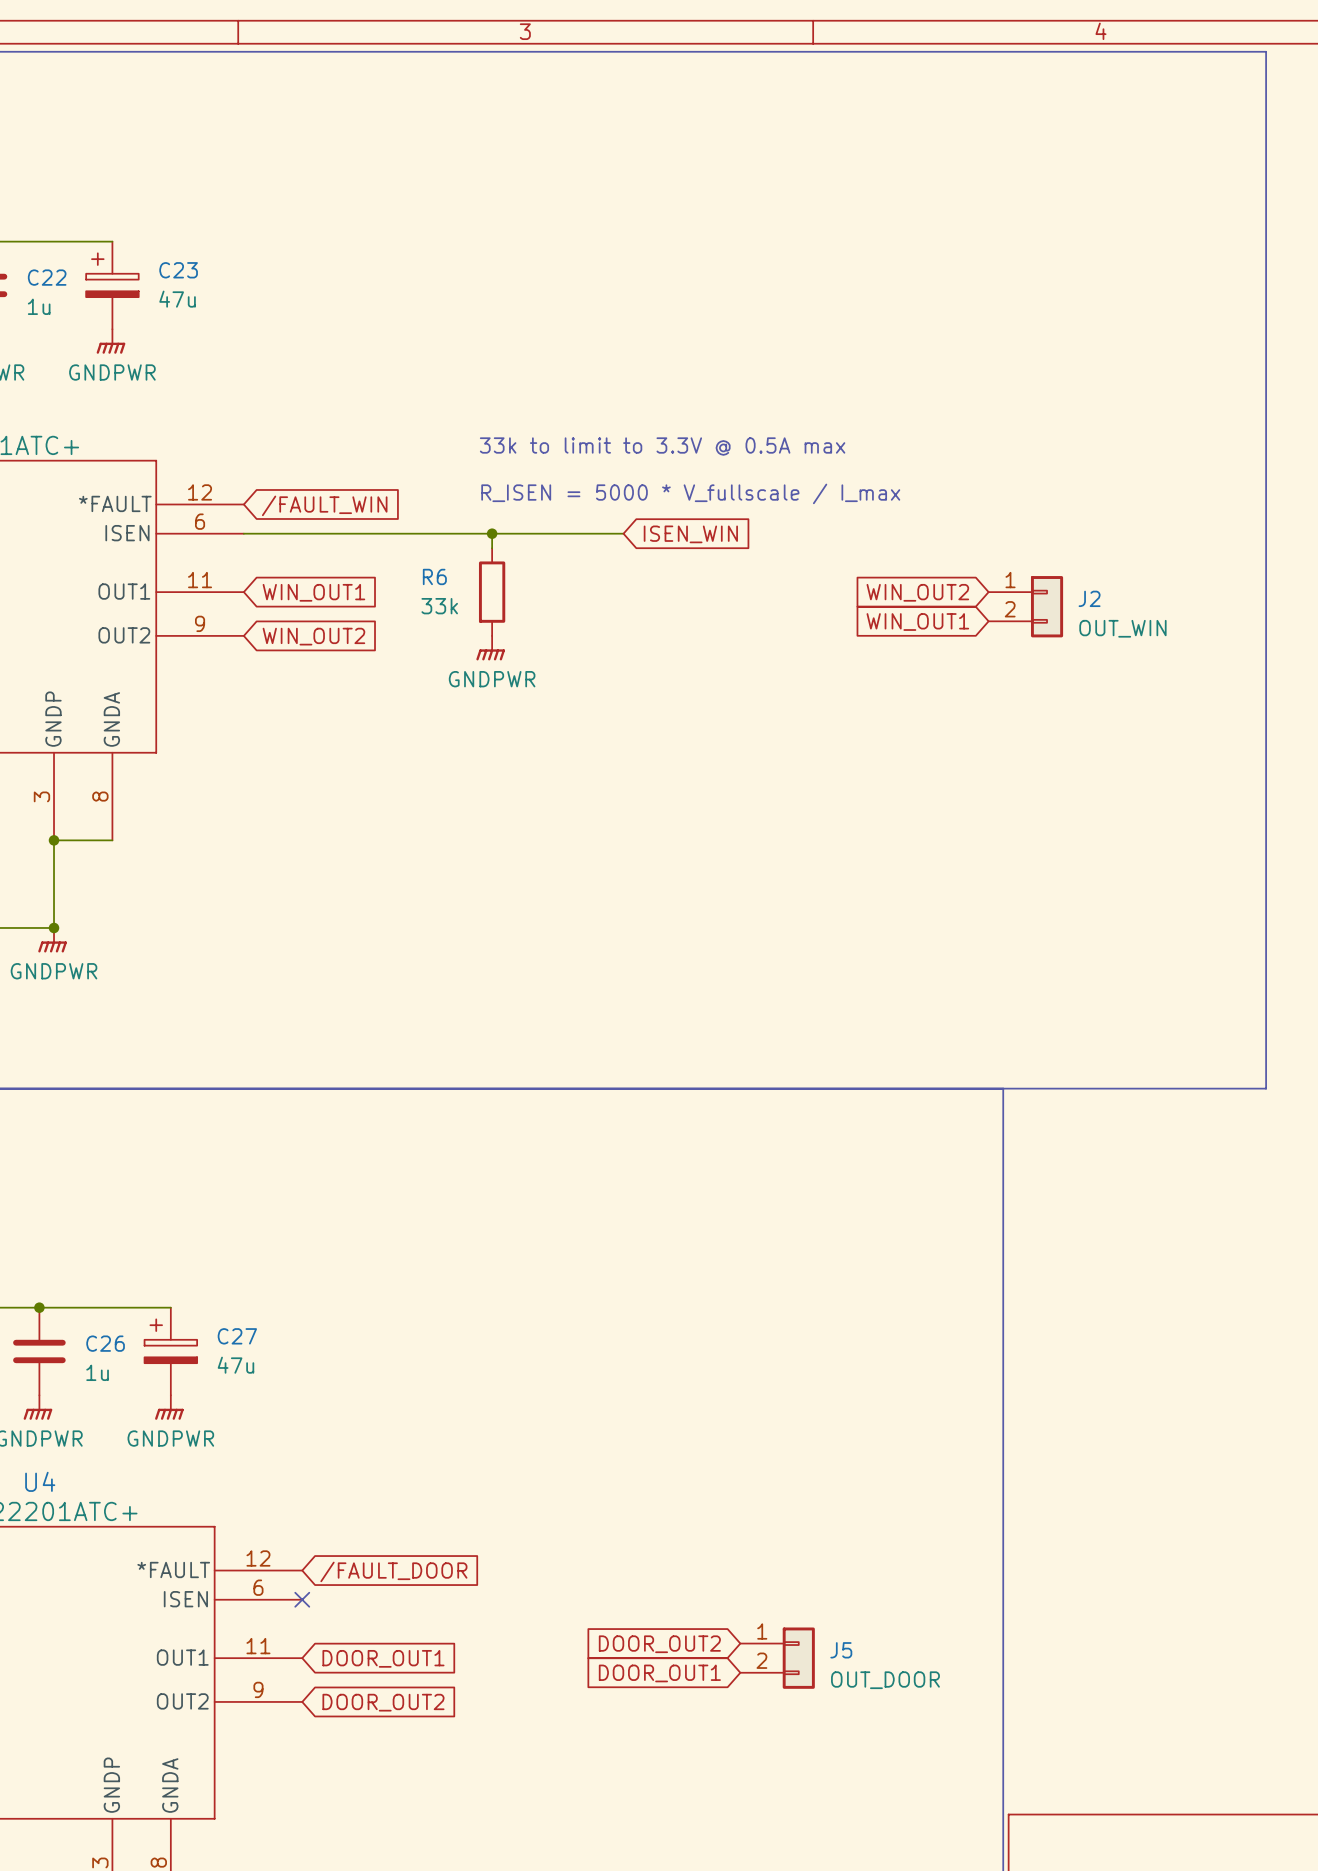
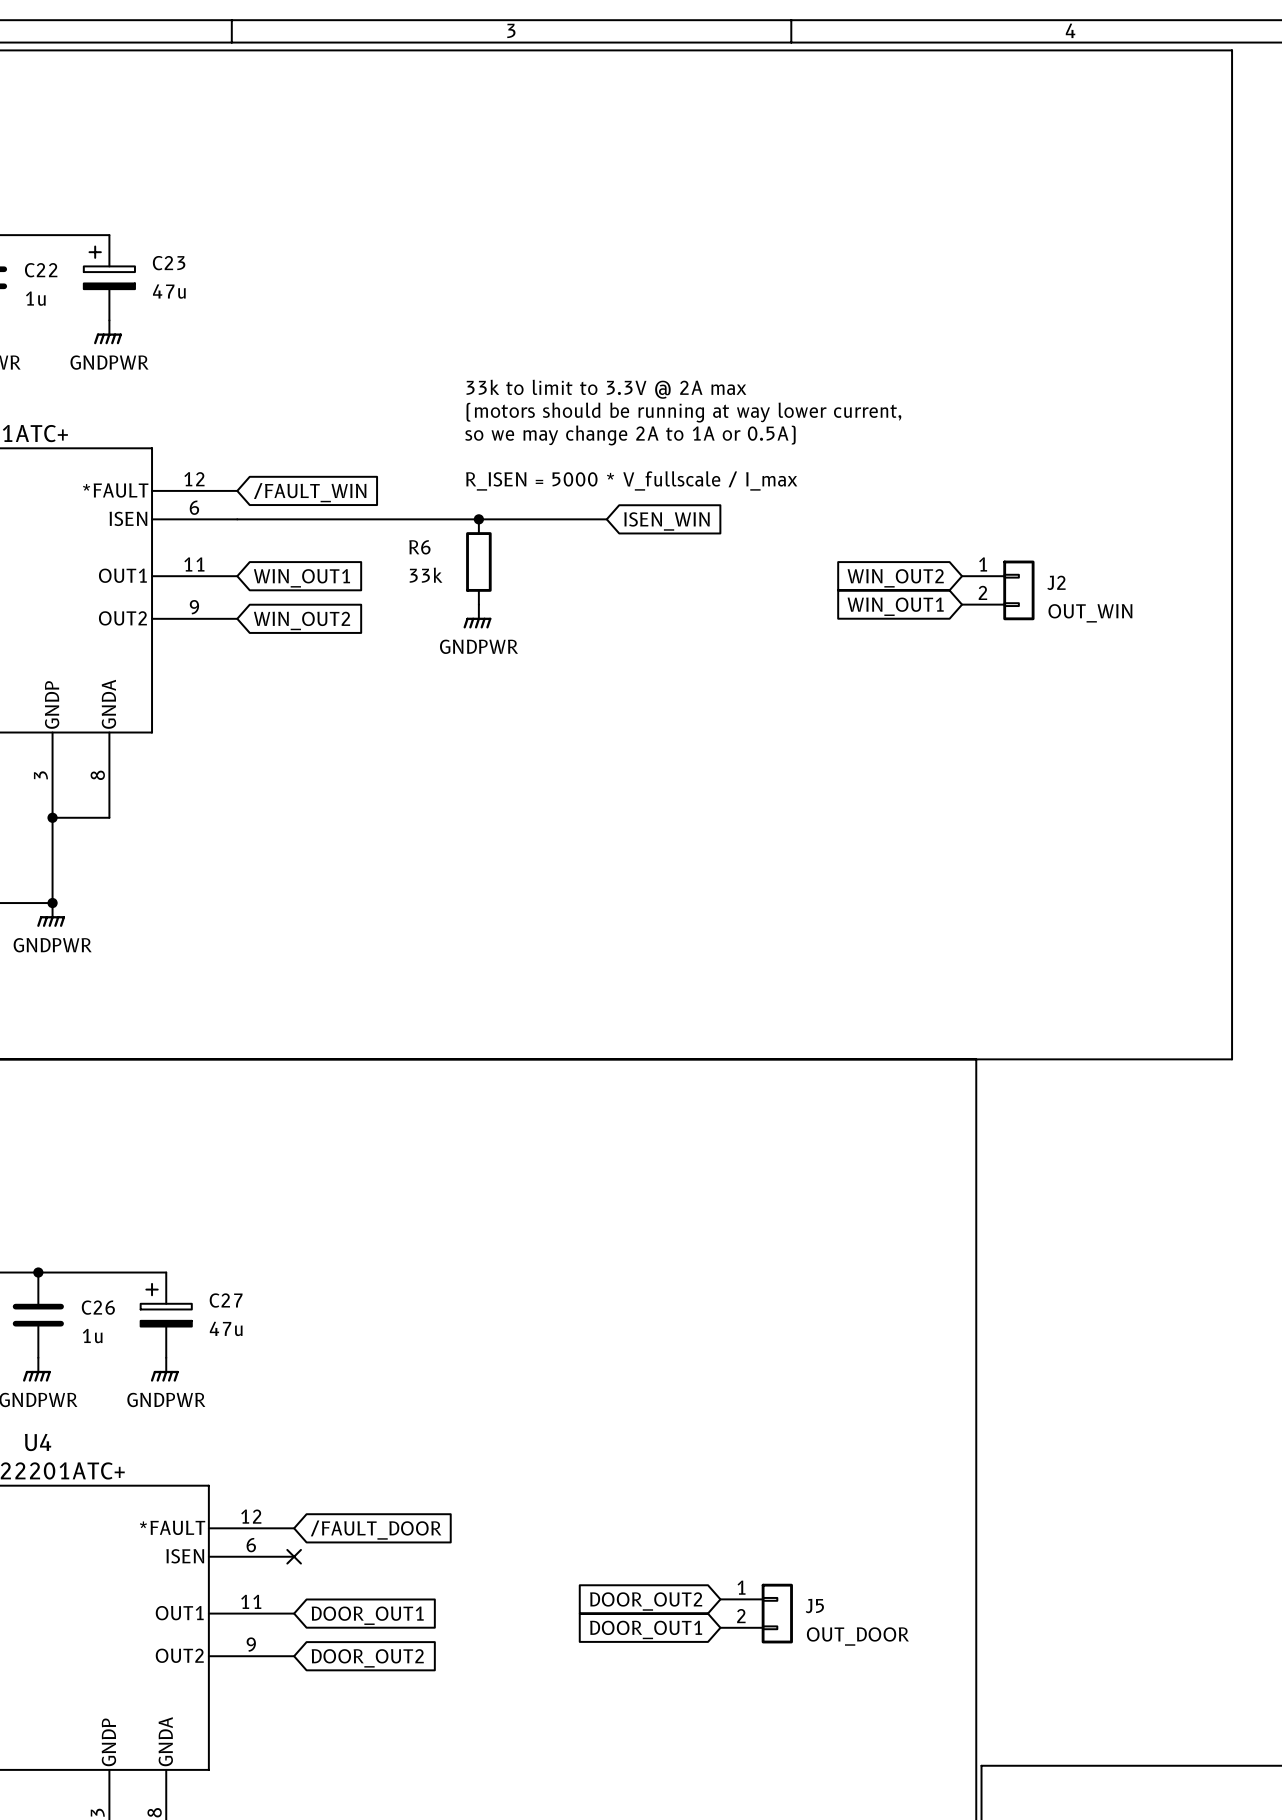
text: none -> 33k to limit to 3.3V @ 2A max (606, 389)
text: none -> (motors should be running at way lower current, (683, 412)
text: 33k to limit to 3.3V @ 0.5A max (662, 446) -> so we may change 2A to 1A or 0.5A) (630, 435)
R6 position: (492, 592) -> (478, 561)
power symbol position: GNDPWR (490, 648) -> GNDPWR (477, 616)

